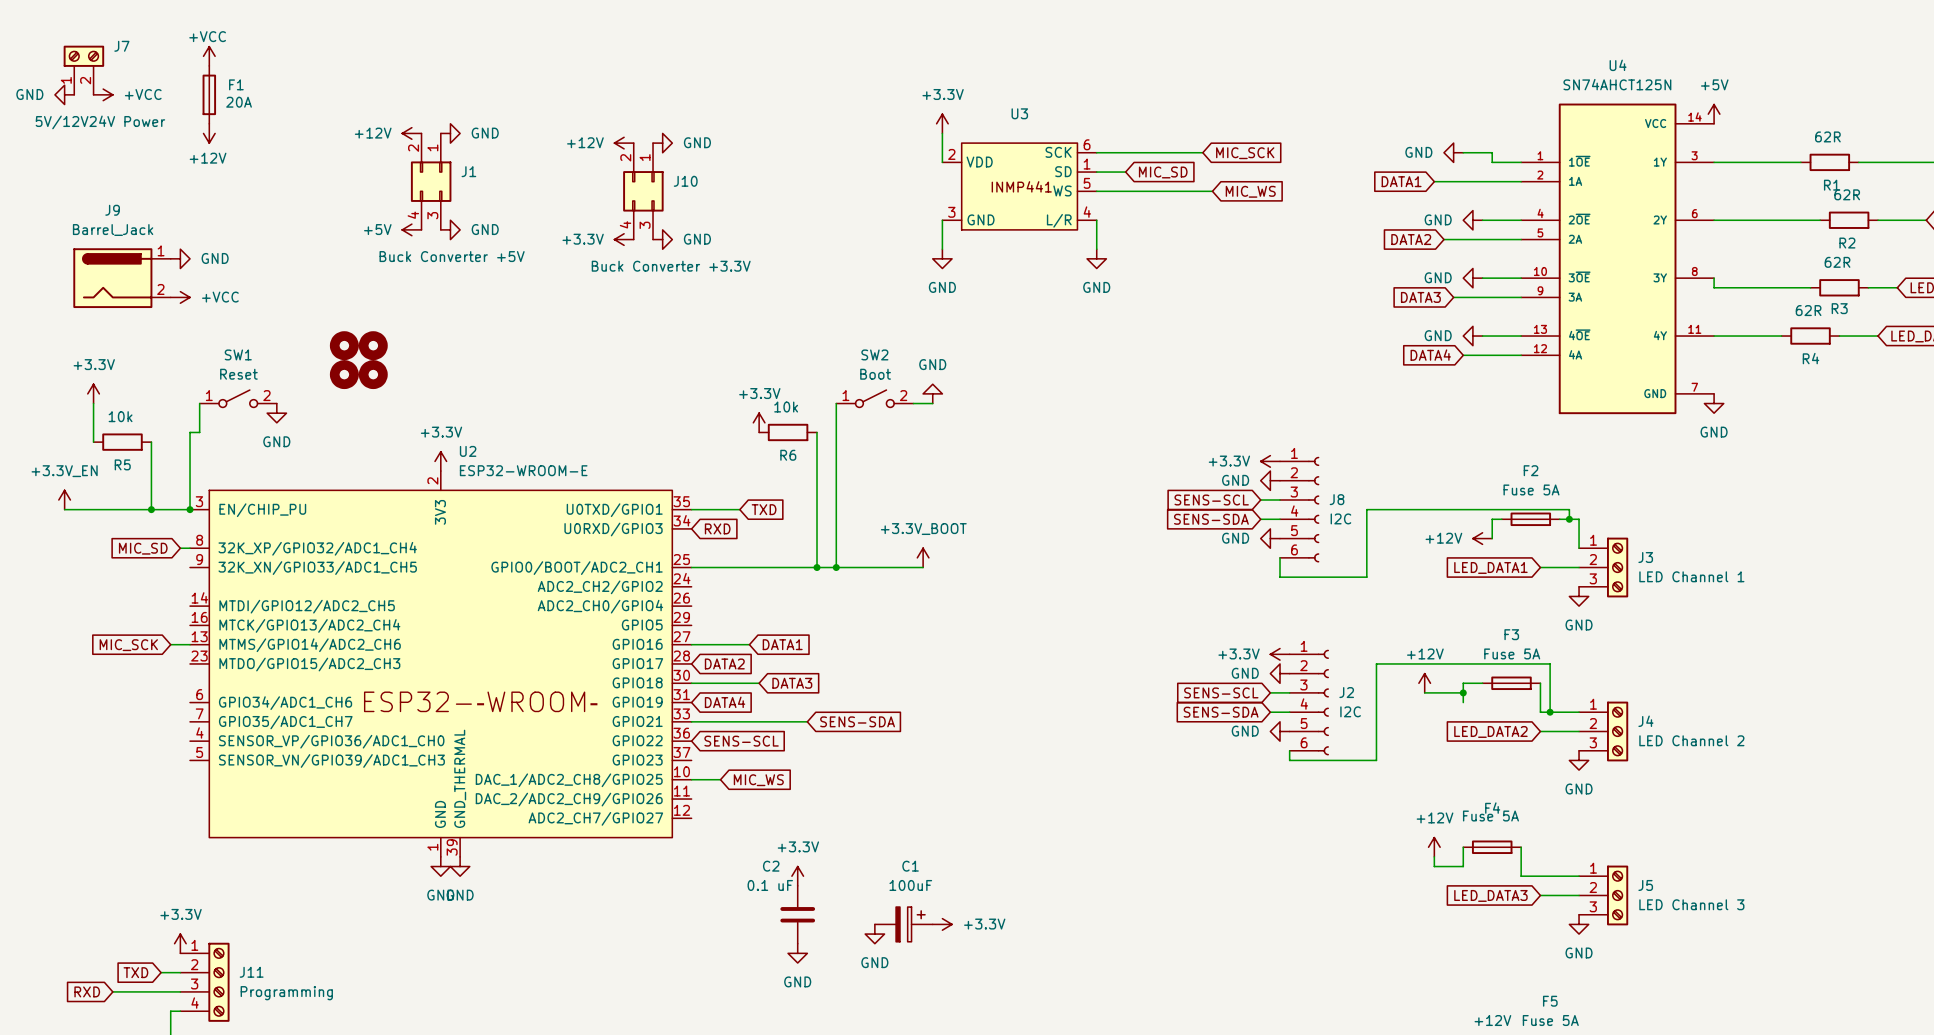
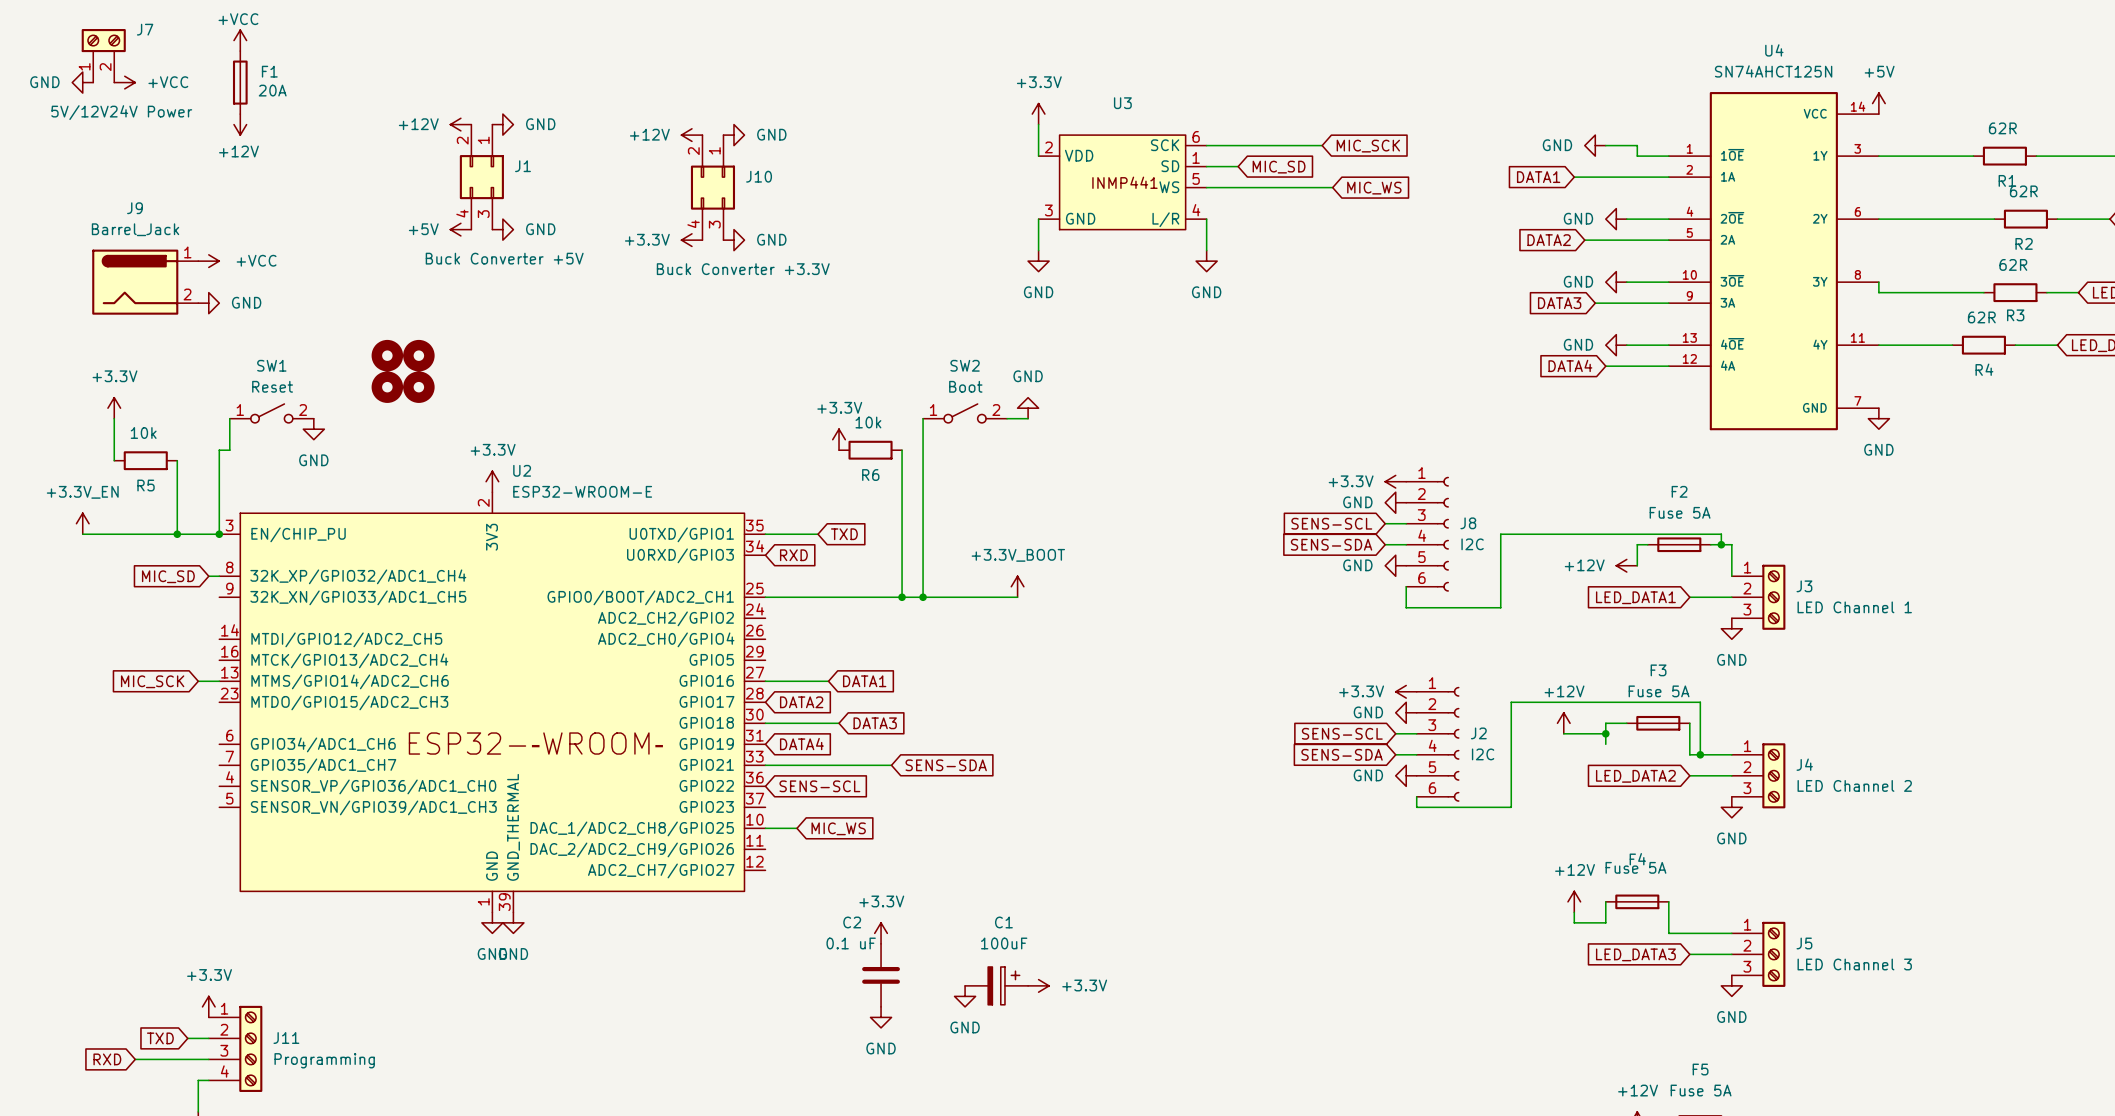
power symbol: GND (180, 258) -> +VCC (208, 261)
power symbol: +VCC (180, 297) -> GND (208, 303)

